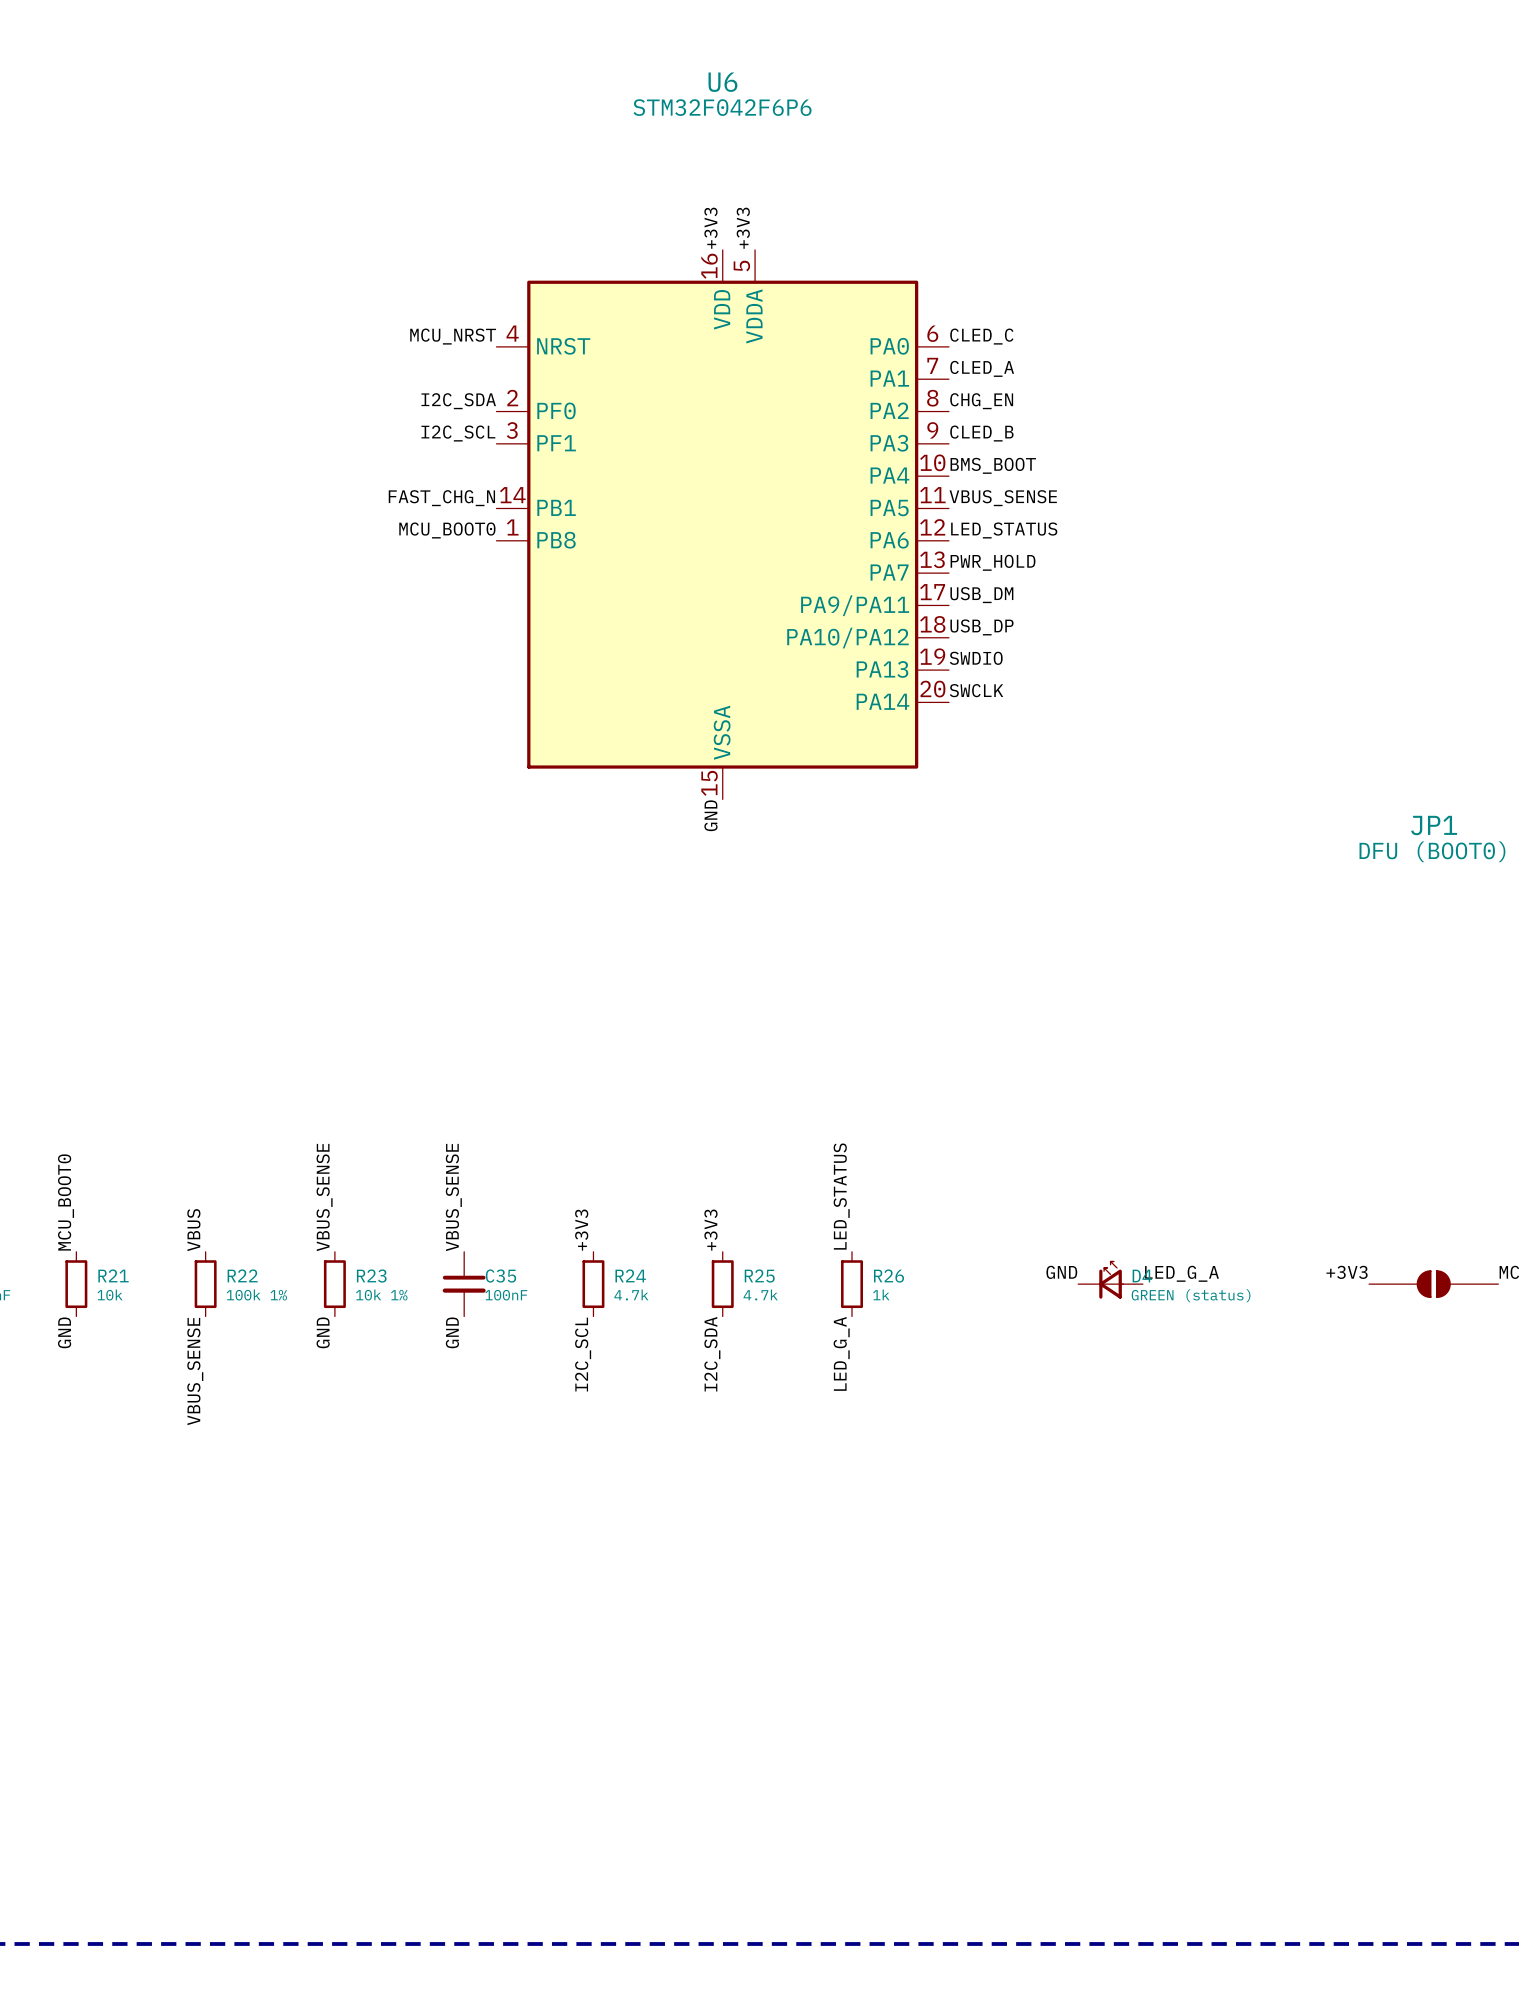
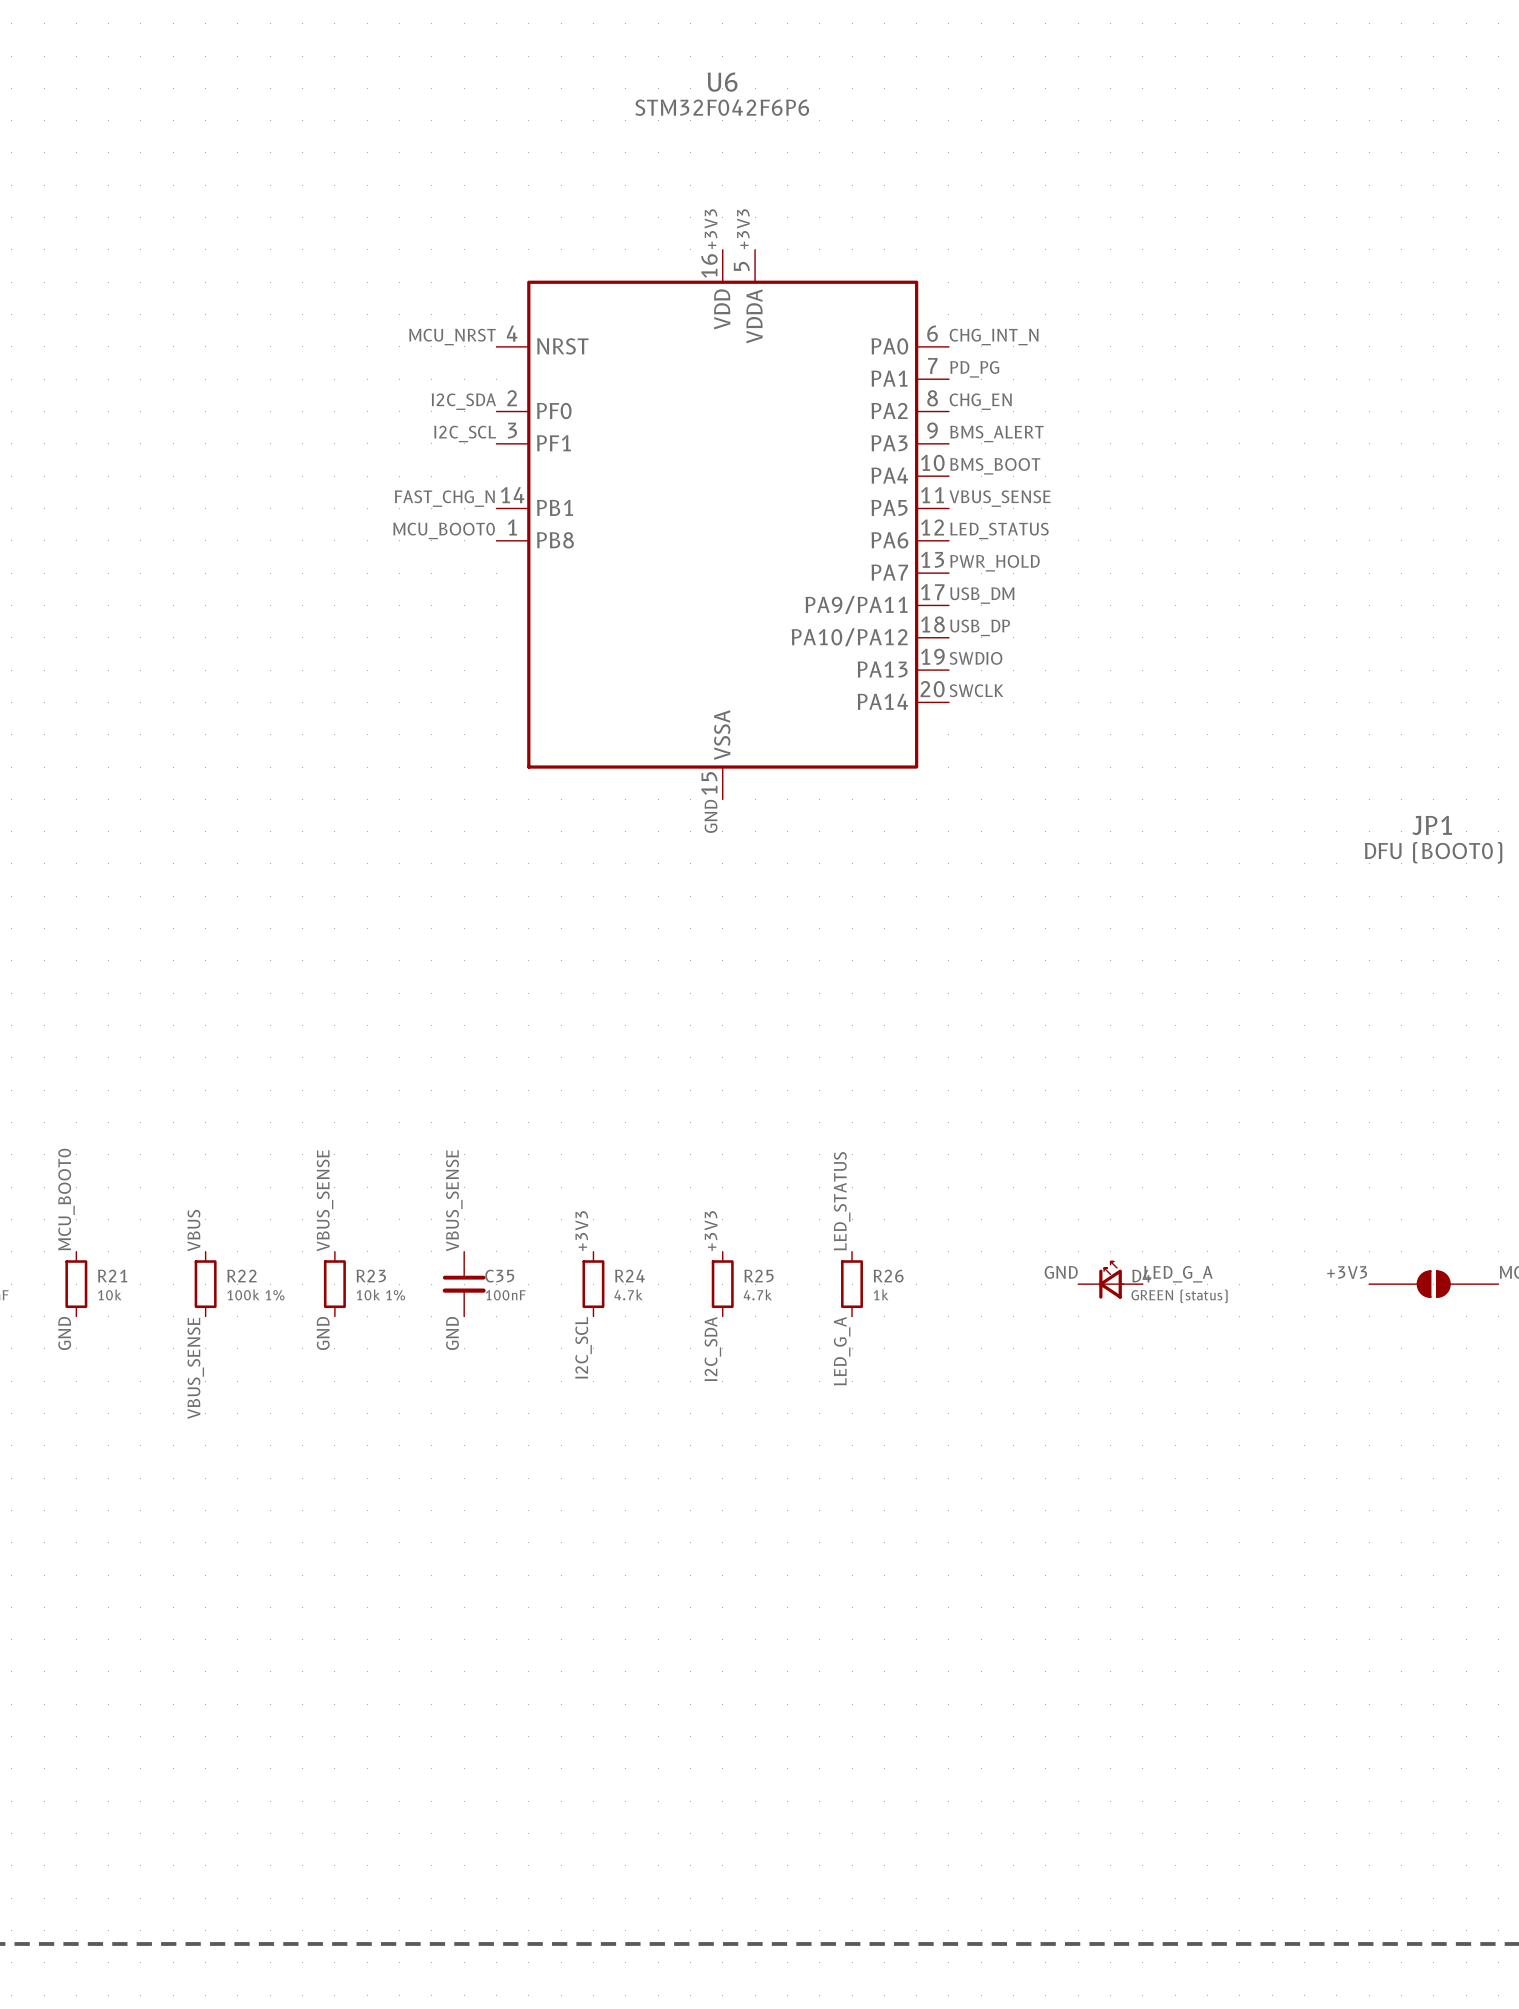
label: CLED_C (981, 336) -> CHG_INT_N (994, 337)
label: CLED_A (982, 368) -> PD_PG (974, 369)
label: CLED_B (981, 433) -> BMS_ALERT (996, 433)

